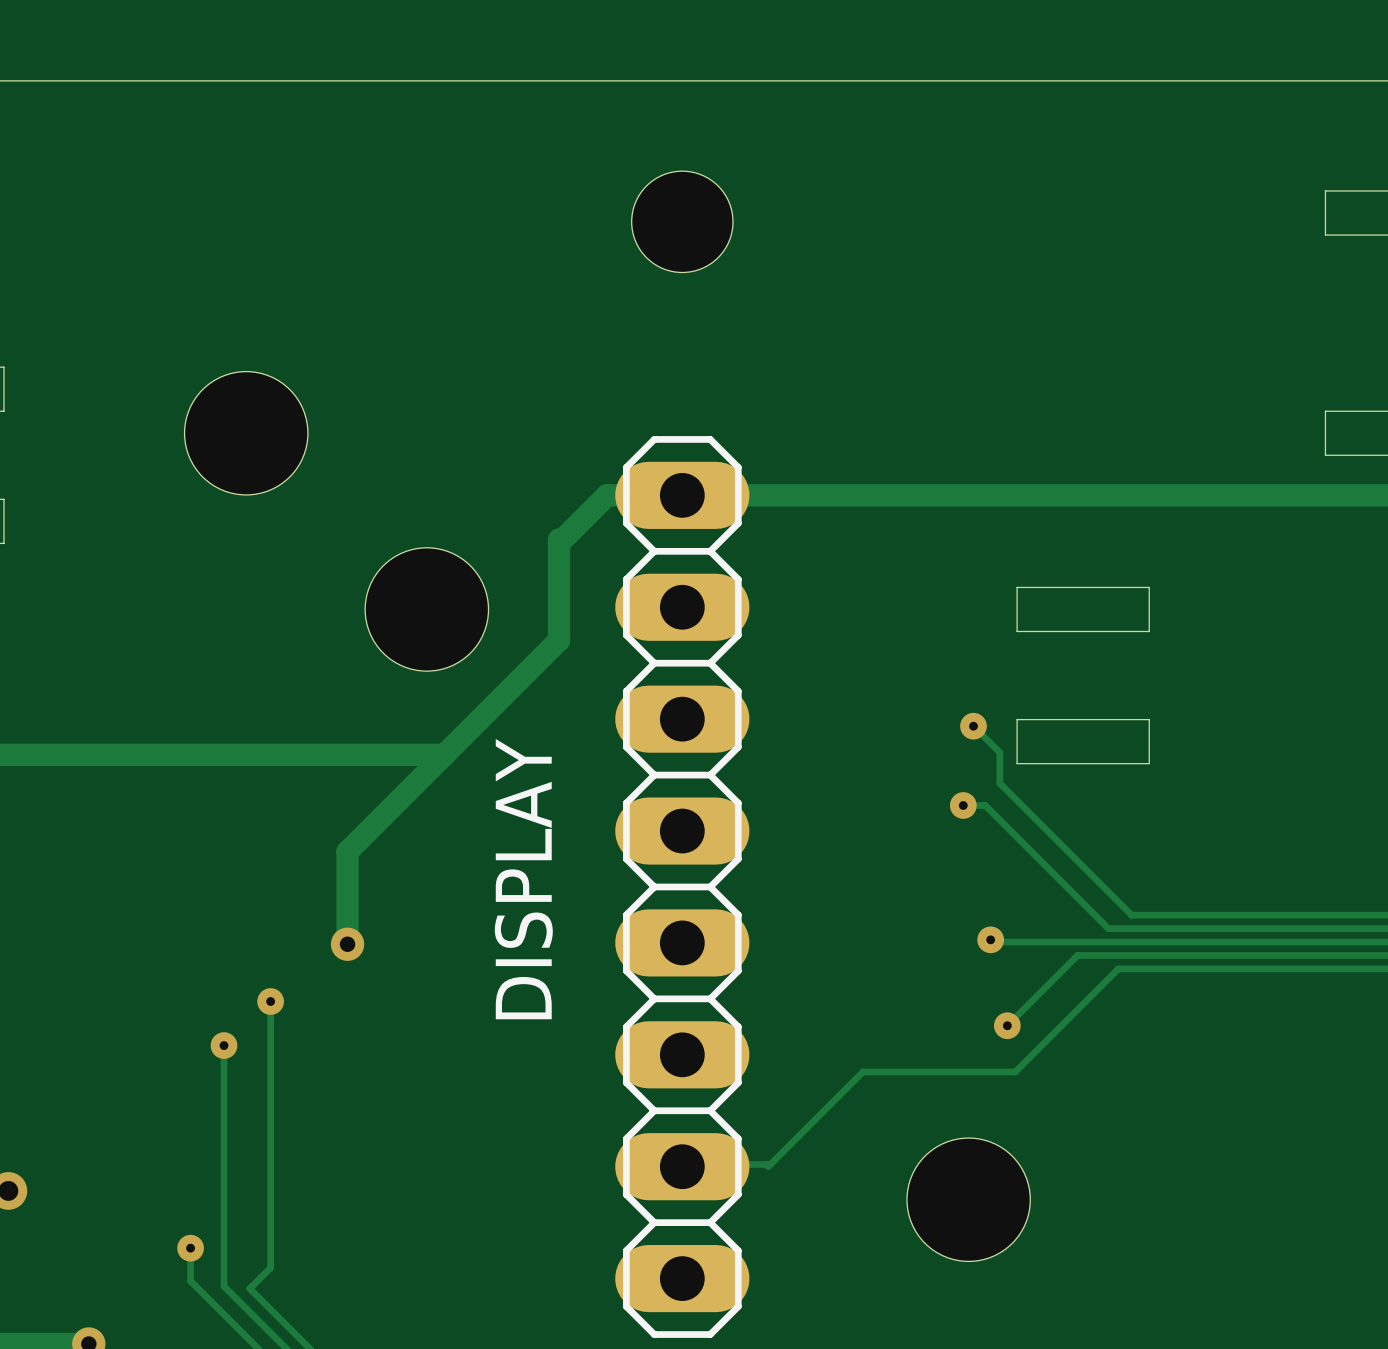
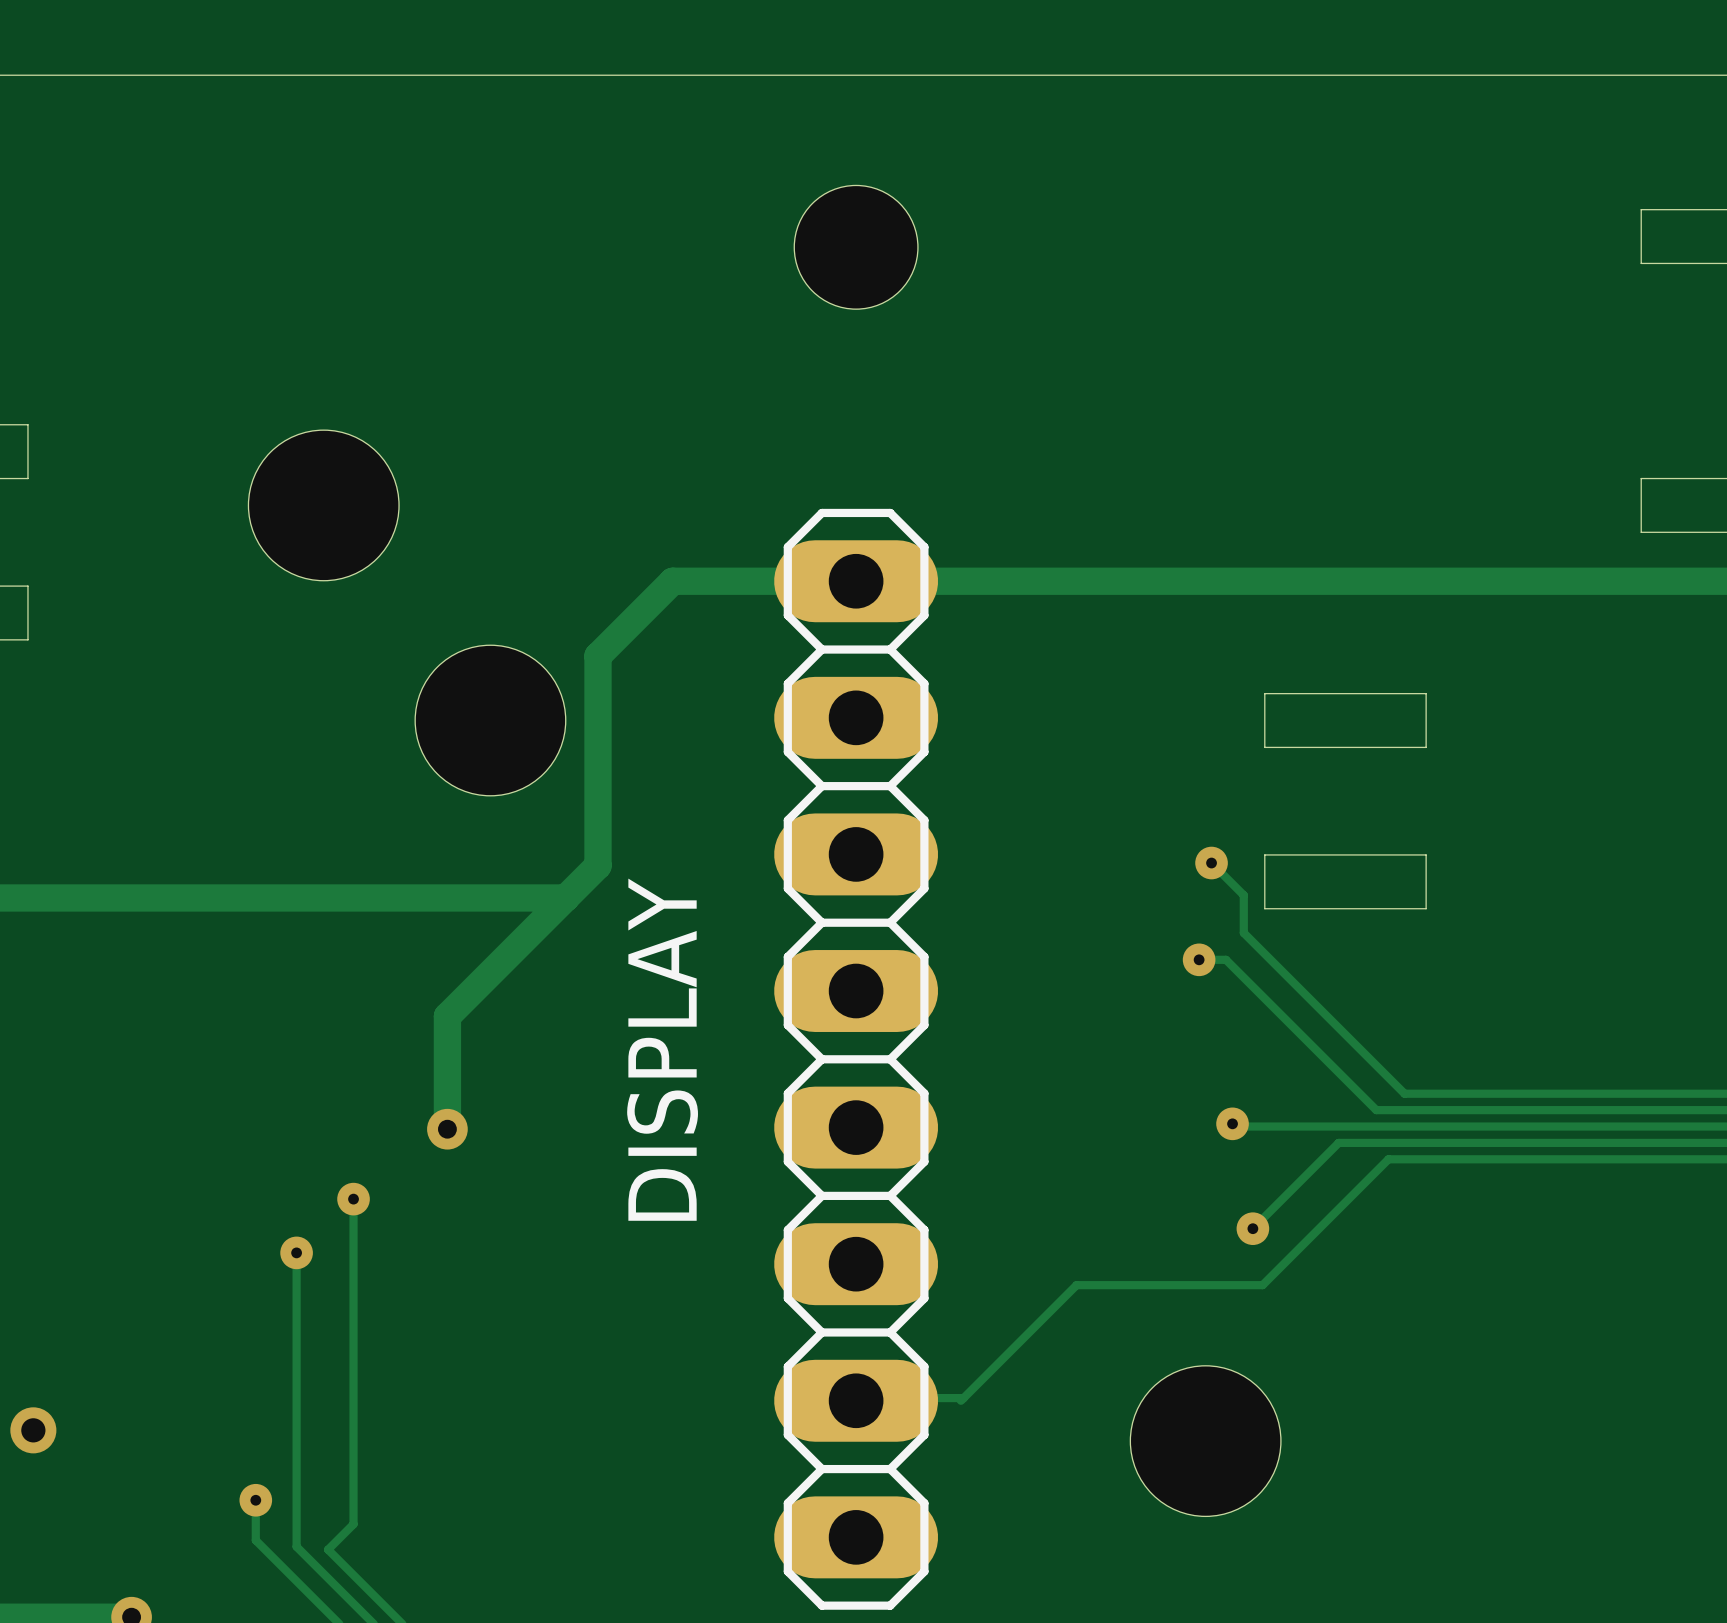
track: (607, 495) (558, 543) -> none
track: (558, 539) (558, 640) (470, 728) -> (764, 581) (672, 581) (597, 655) (597, 865)
hole position: (426, 609) -> (490, 720)

